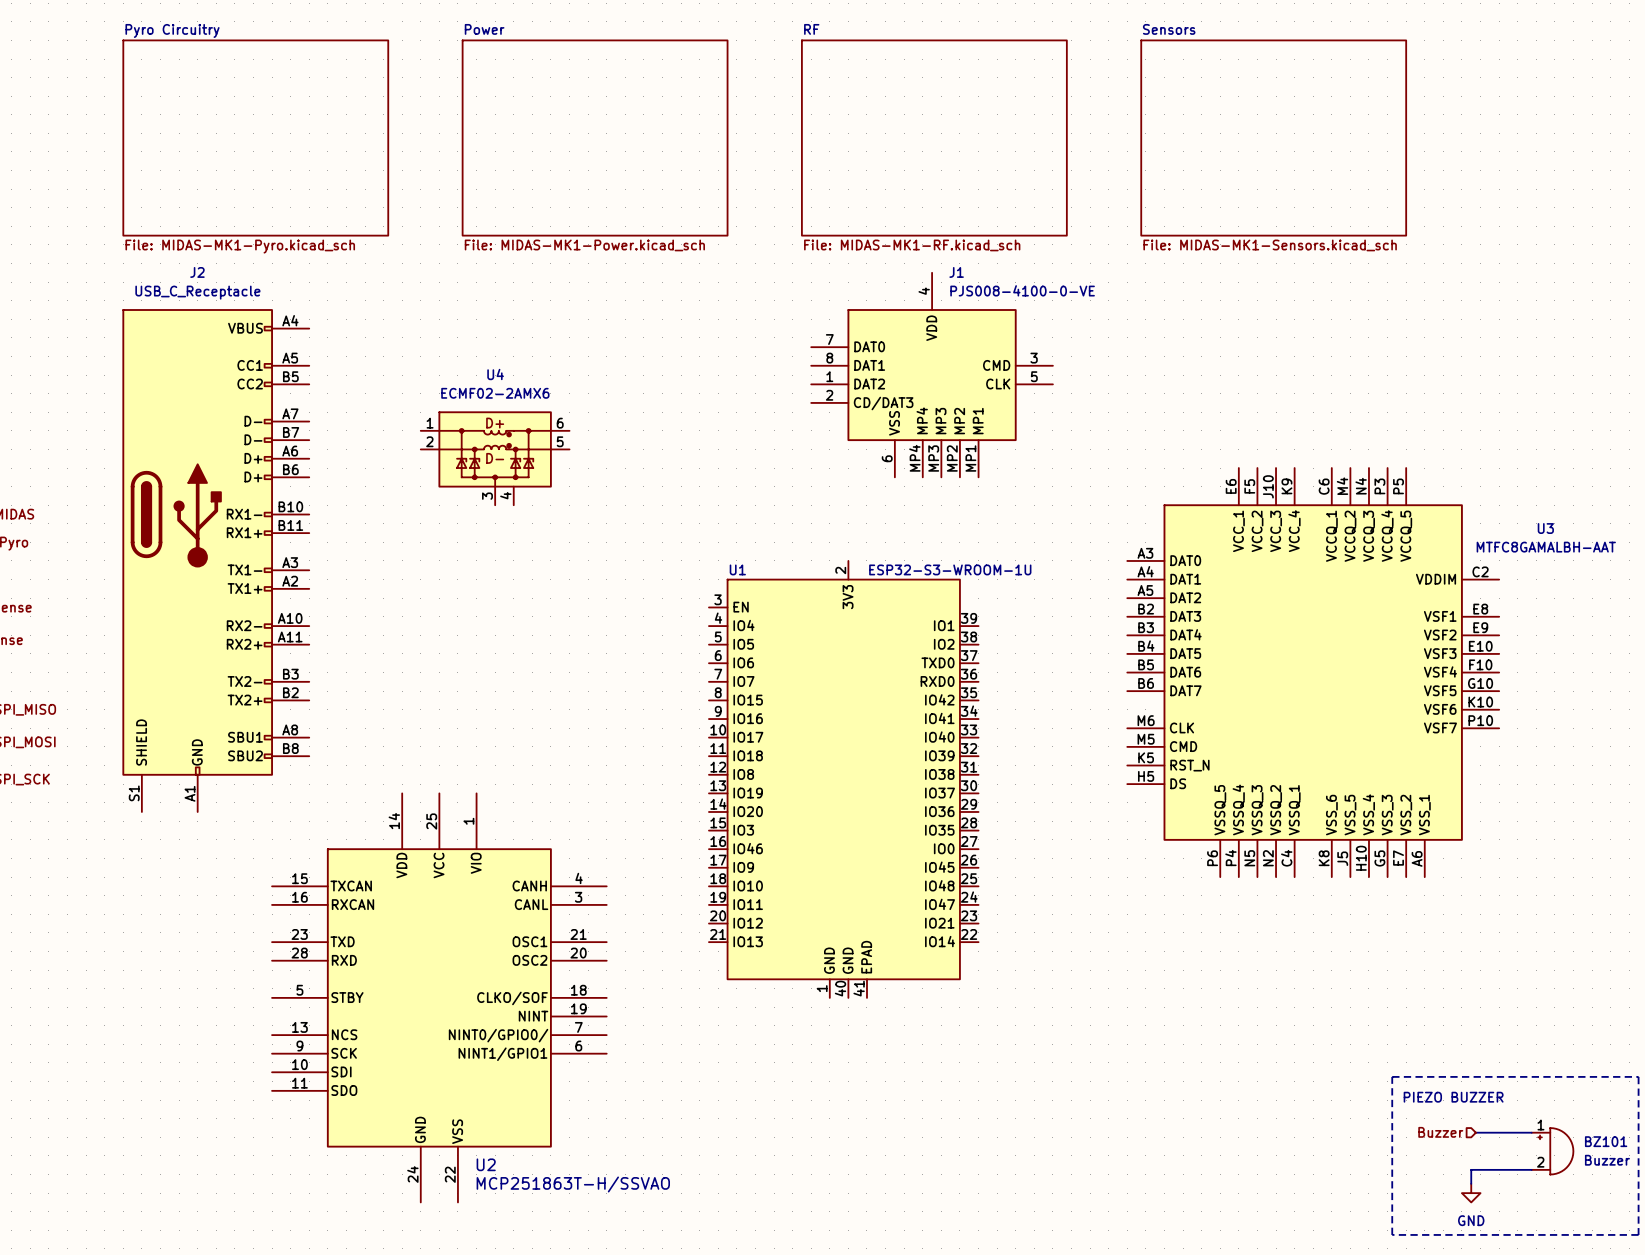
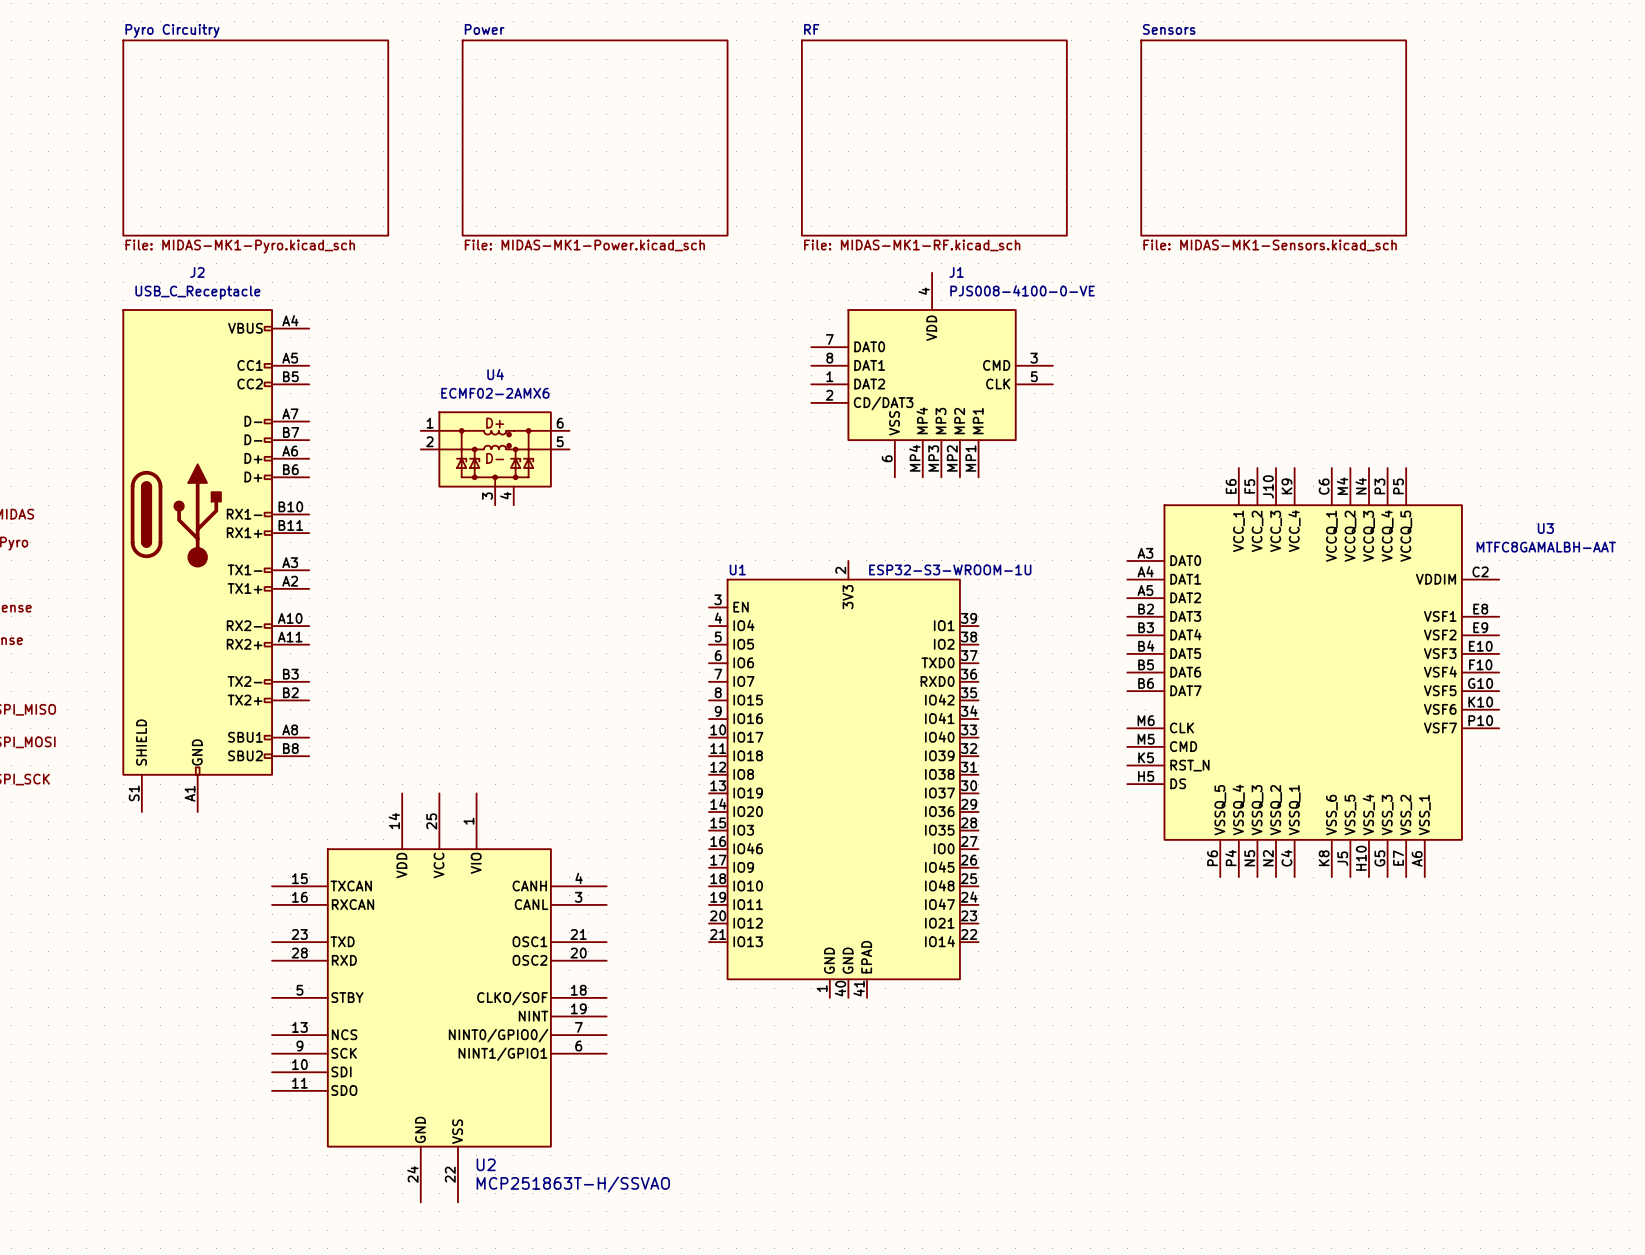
line: (1392, 1076) (1638, 1076) (1638, 1234) (1392, 1234) (1392, 1076) -> none
text: PIEZO BUZZER (1453, 1097) -> none
hierarchical label: Buzzer (1440, 1132) -> none
wire: (1475, 1132) (1531, 1132) -> none
BZ101: Buzzer (1552, 1151) -> none
wire: (1531, 1169) (1471, 1169) (1471, 1183) -> none
power symbol: GND (1471, 1193) -> none

